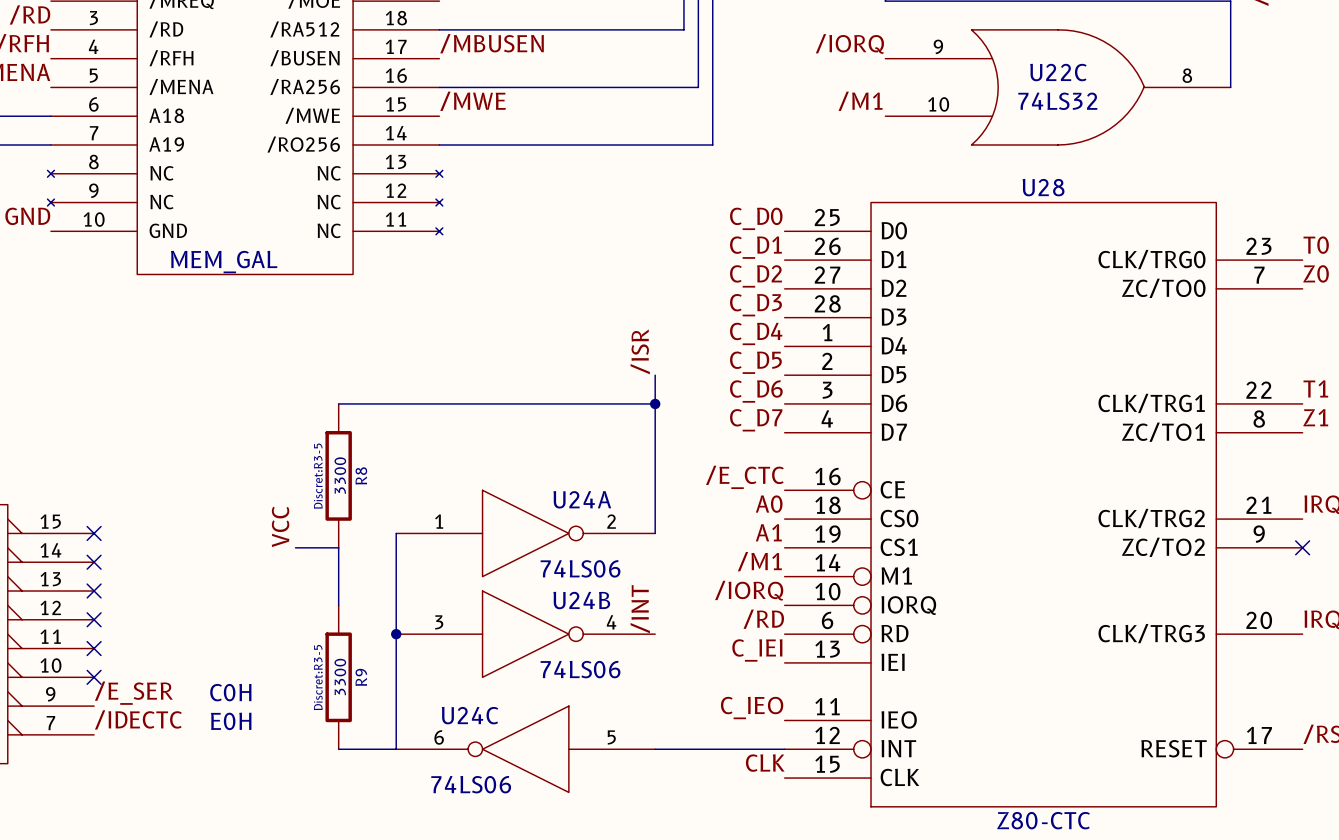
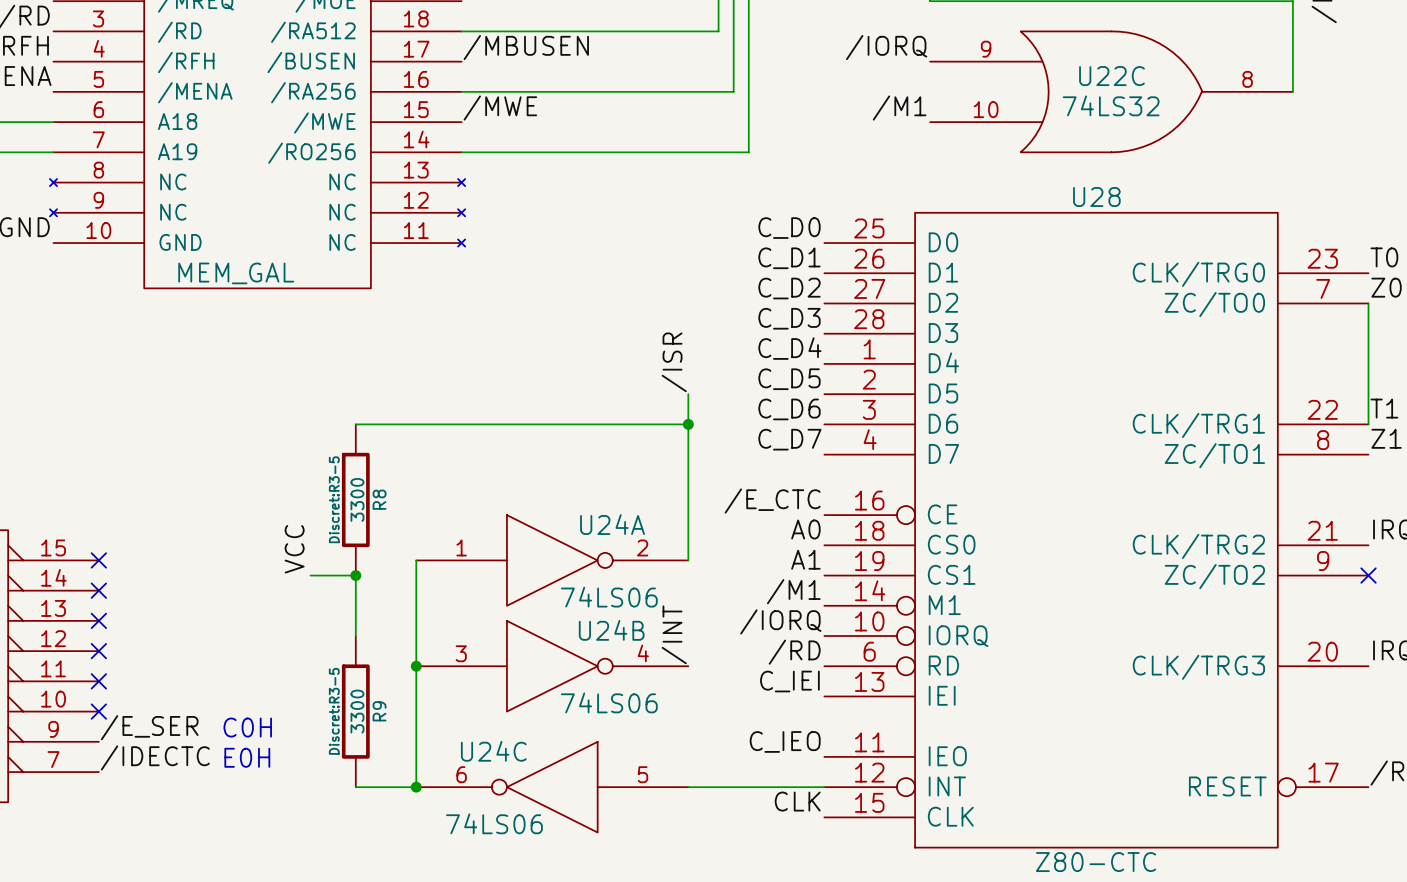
wire: none -> (1368, 303) (1368, 424)
junction: none -> (355, 575)
junction: none -> (416, 787)

